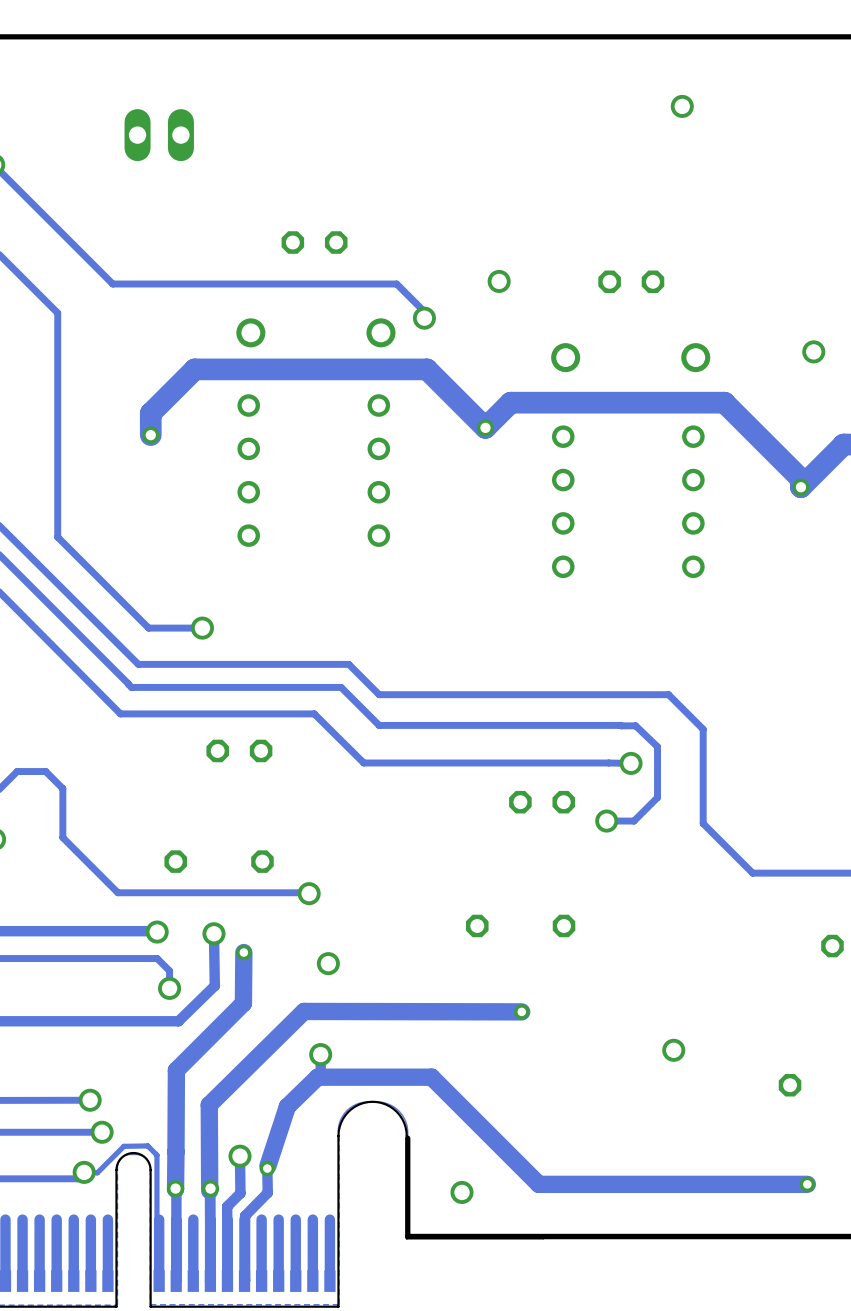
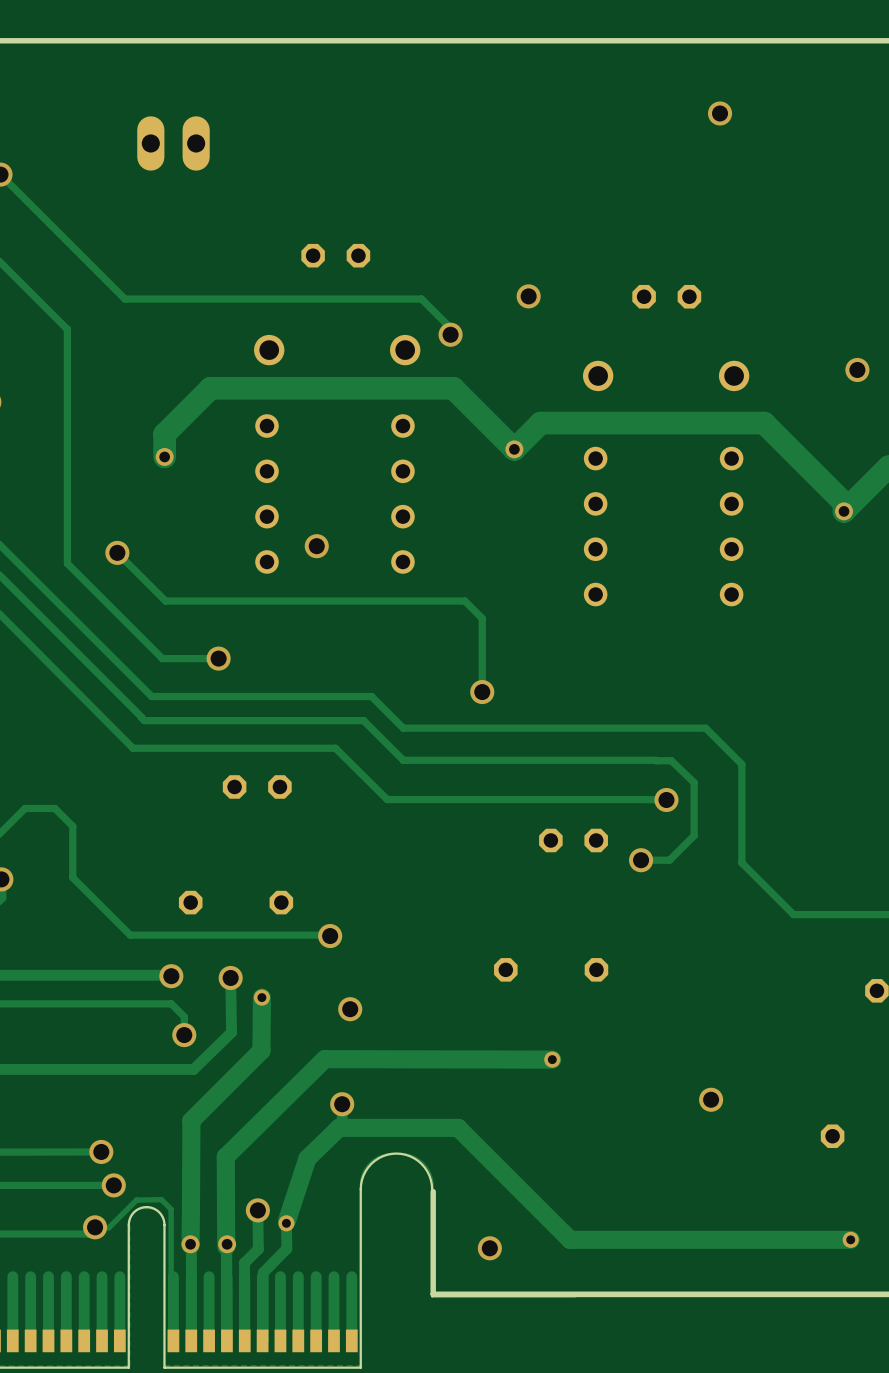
via: none -> (316, 546)
track: none -> (117, 552) (165, 601) (464, 601) (482, 618) (482, 692)
via: none -> (117, 552)
via: none -> (482, 692)

